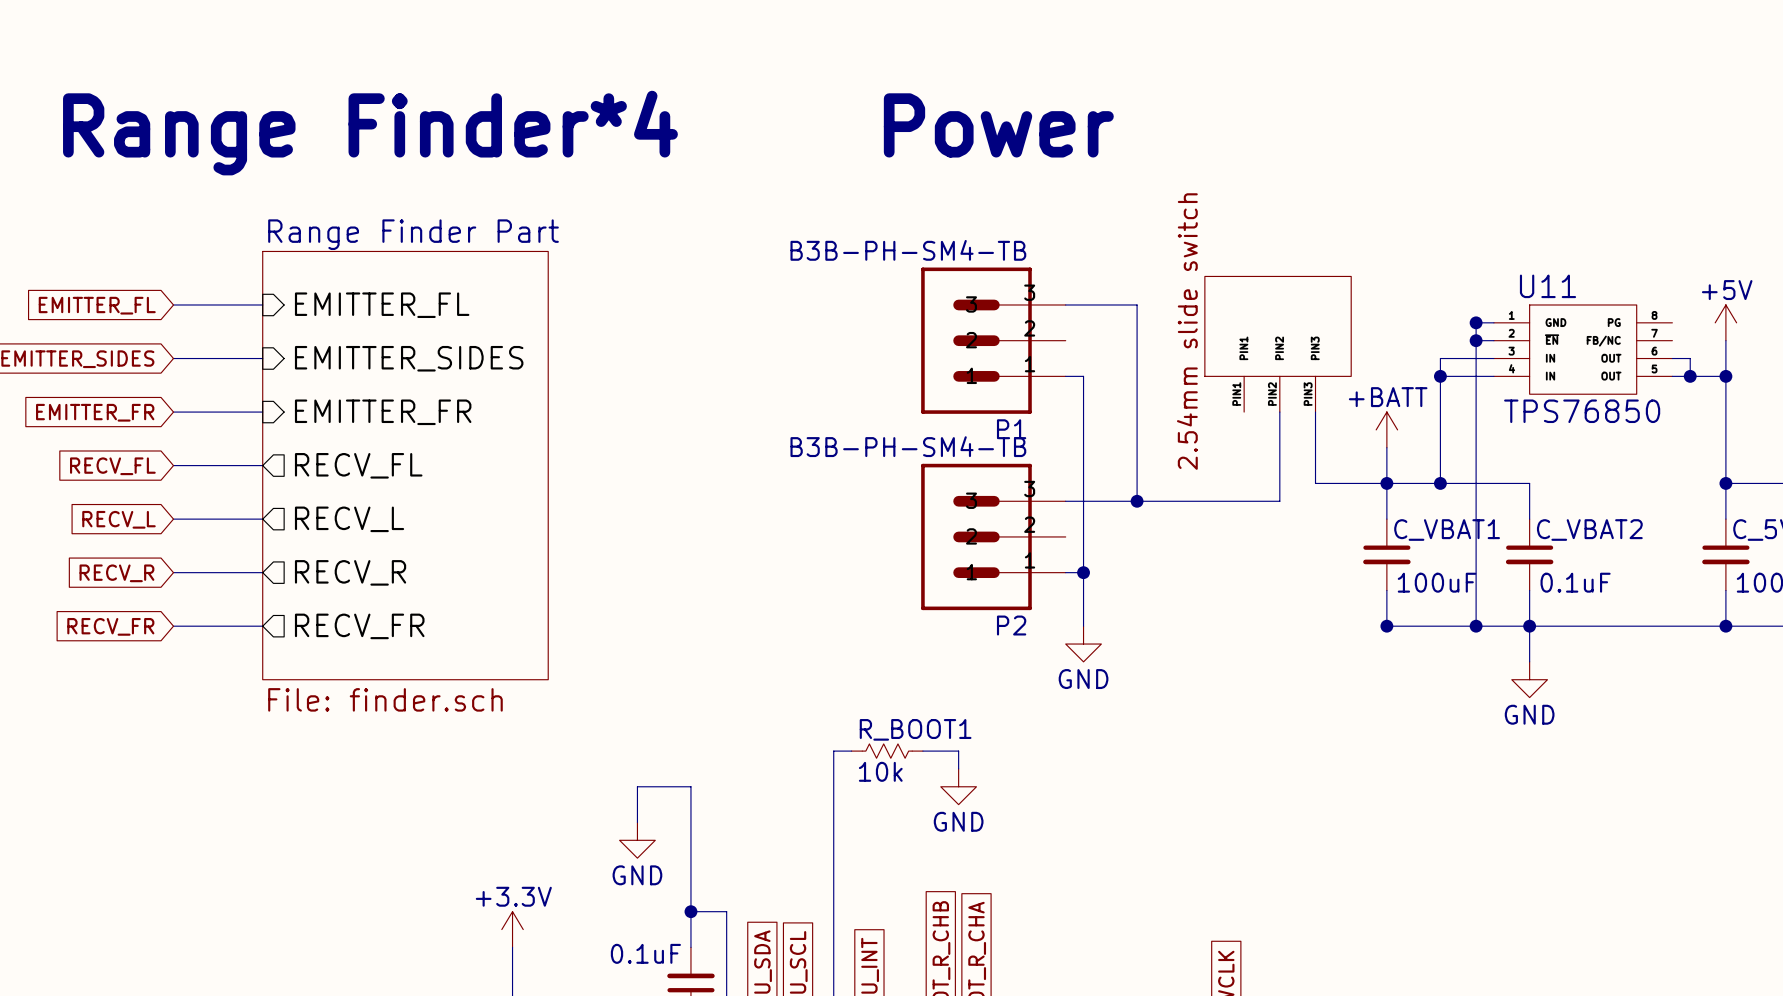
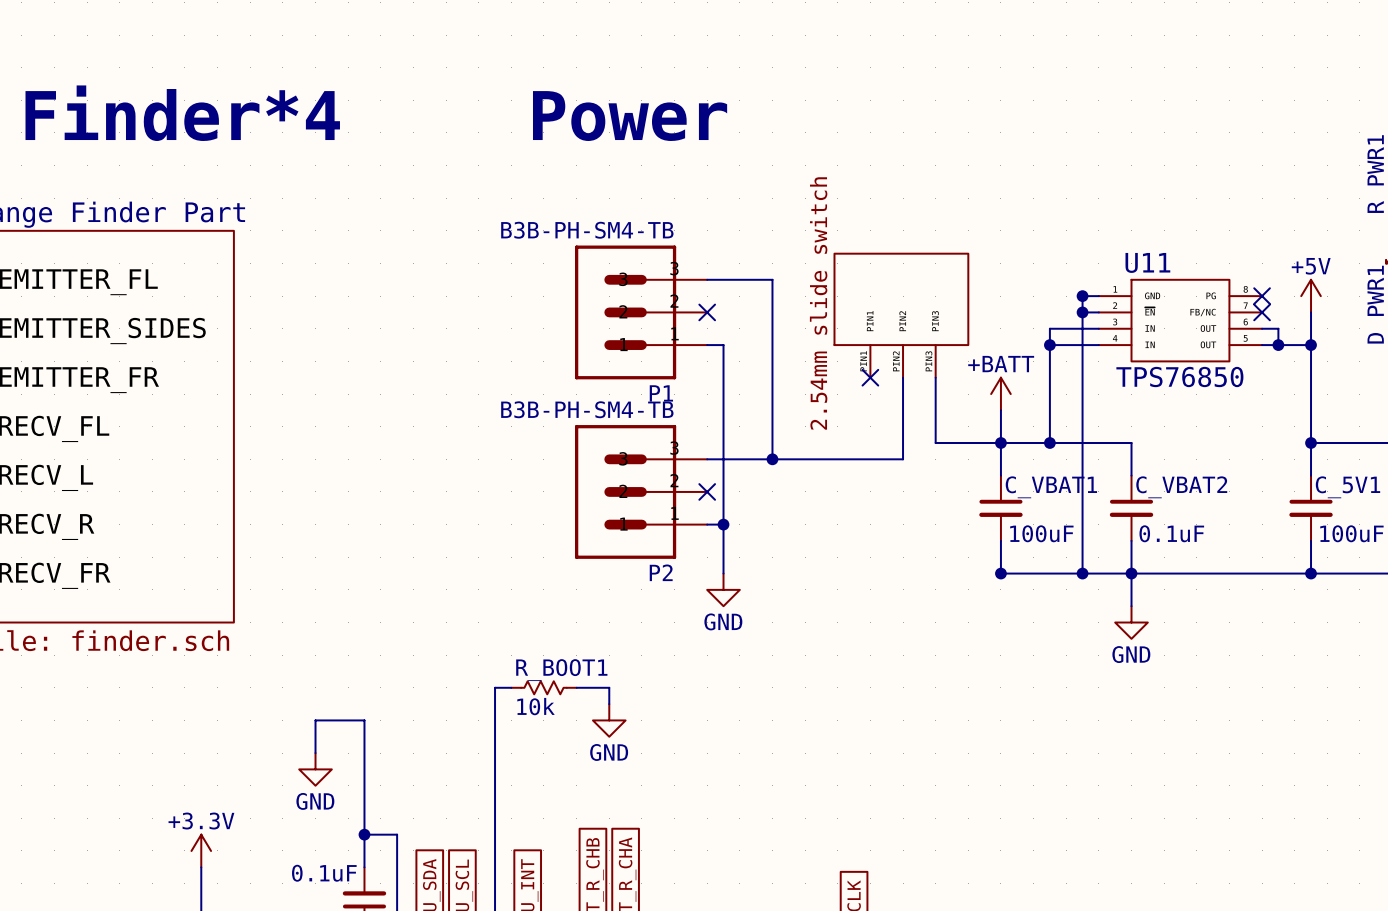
no-connect mark: none -> (1262, 296)
no-connect mark: none -> (707, 312)
no-connect mark: none -> (1262, 312)
no-connect mark: none -> (870, 377)
no-connect mark: none -> (707, 491)

